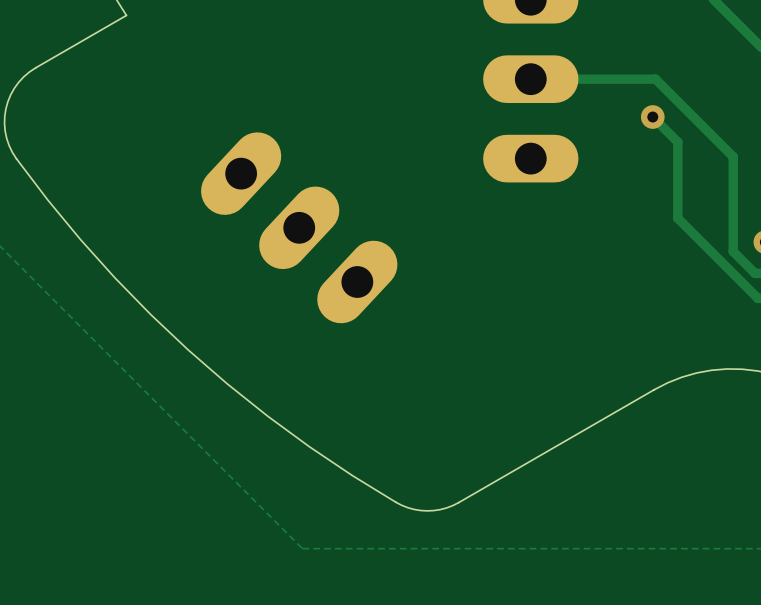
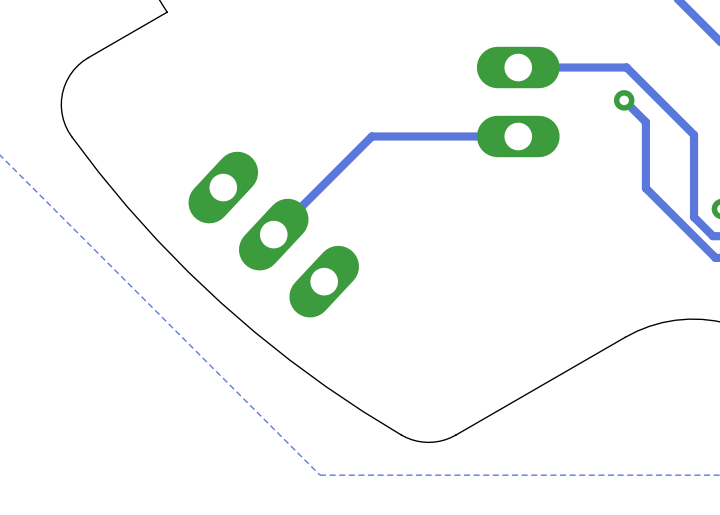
track: none -> (518, 136) (371, 136) (273, 234)
part position: (299, 227) -> (273, 234)

